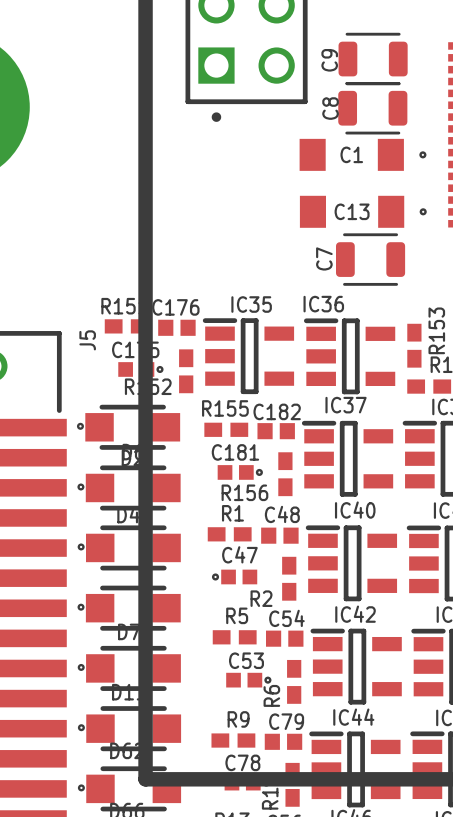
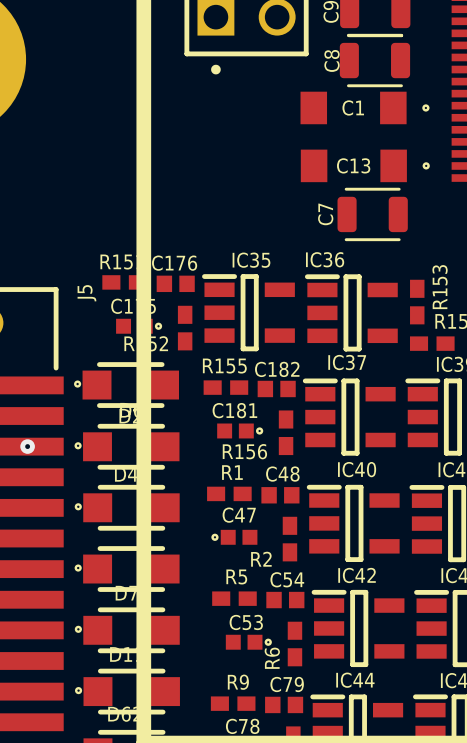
via: none -> (27, 446)

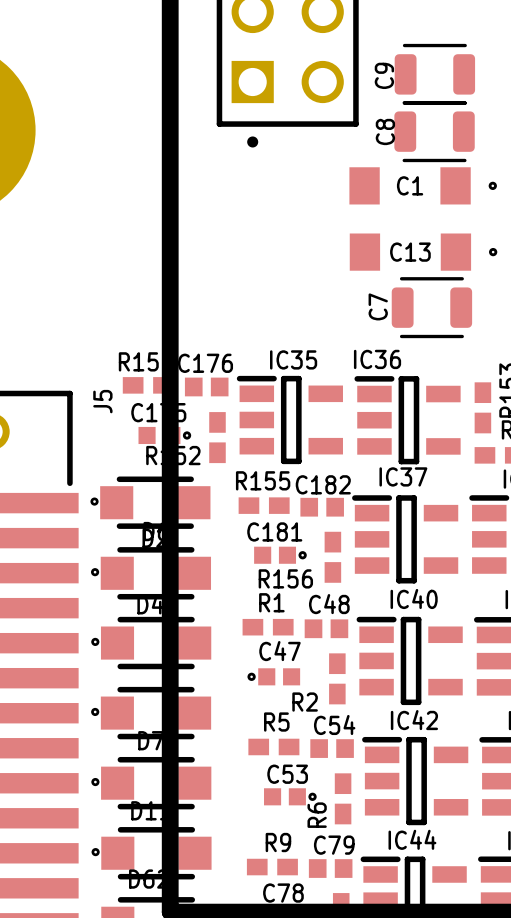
via: (27, 446) -> none

